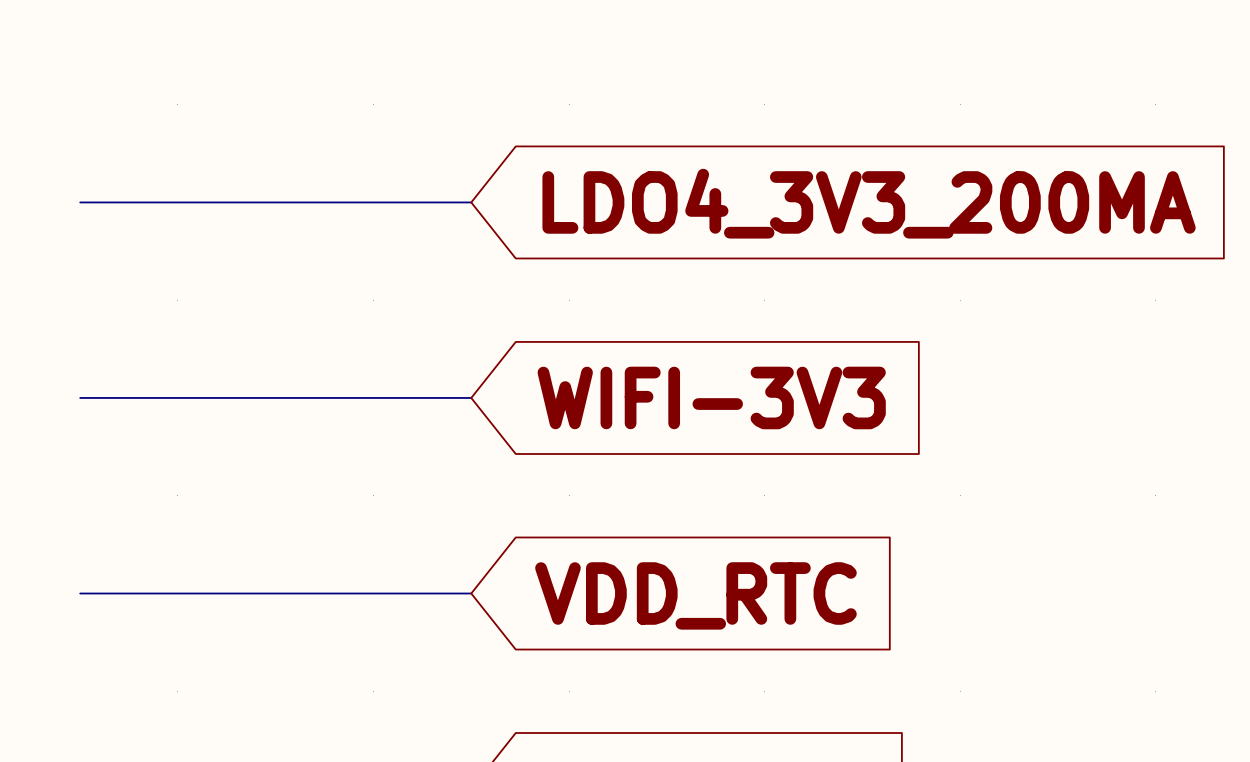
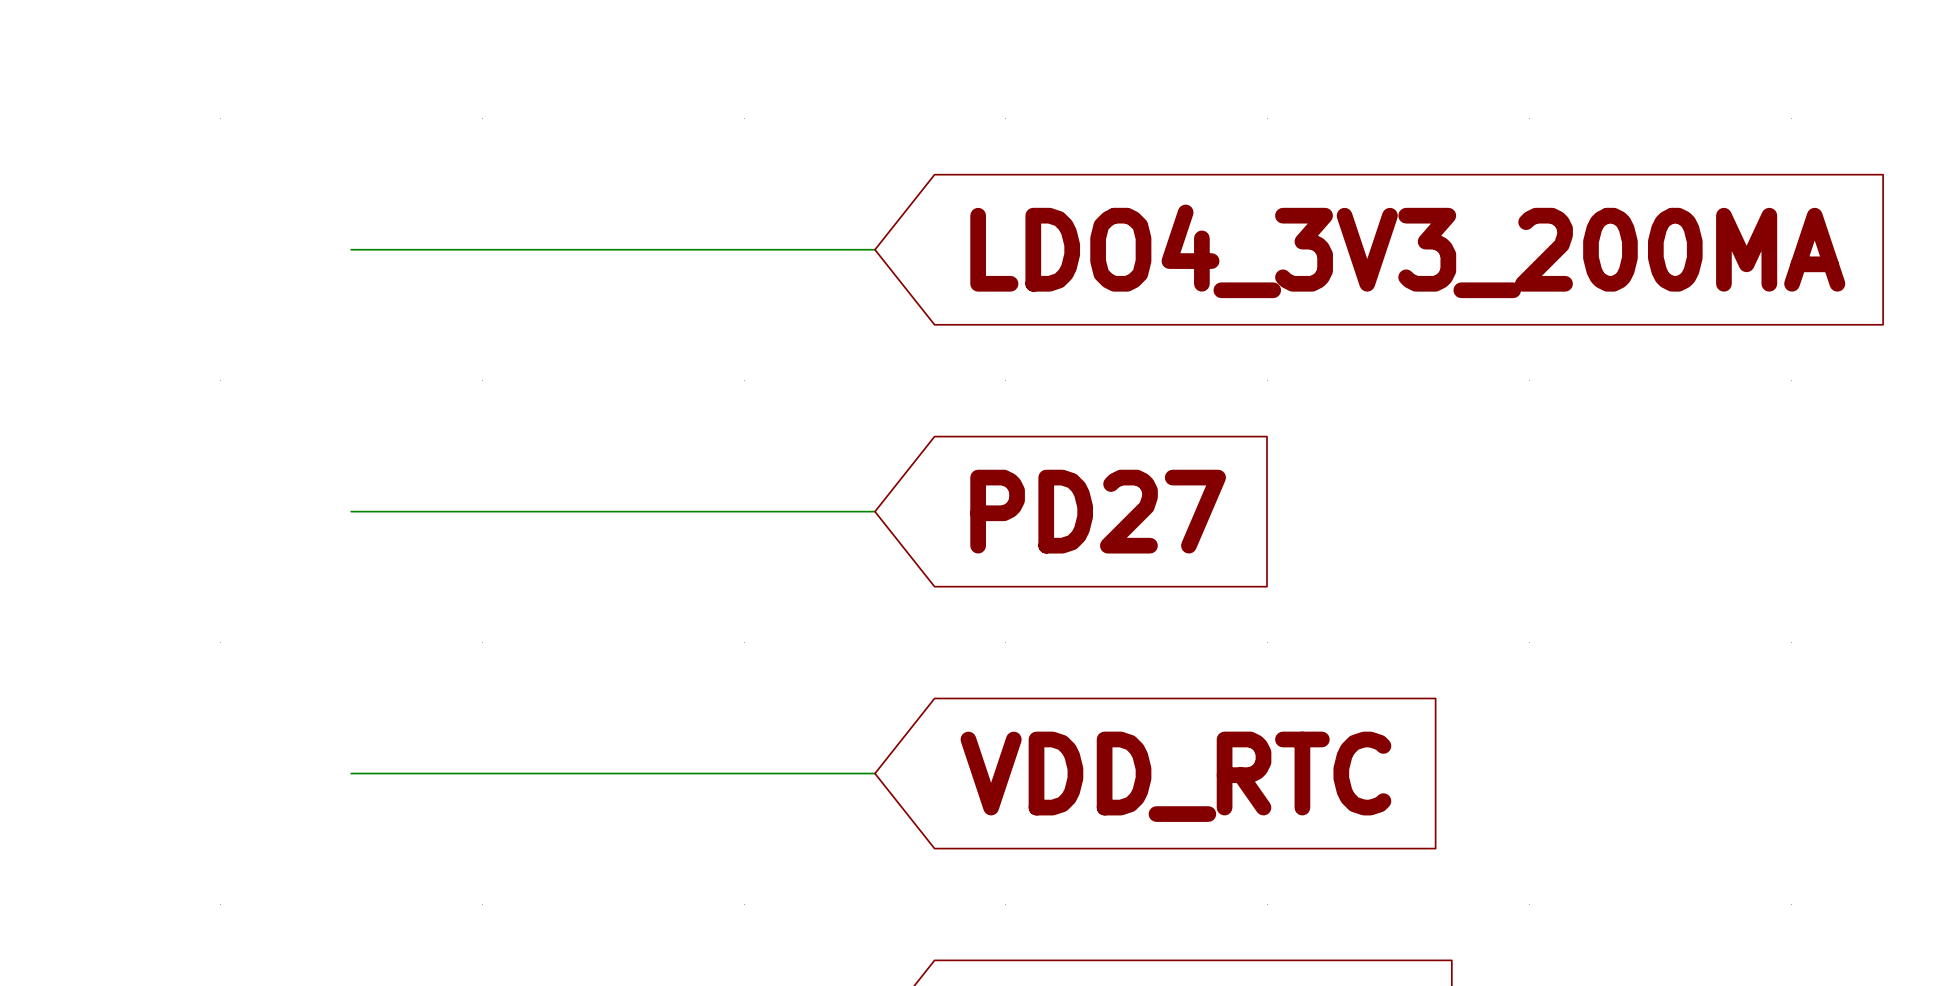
global label: WIFI-3V3 (711, 397) -> PD27 (1098, 511)

